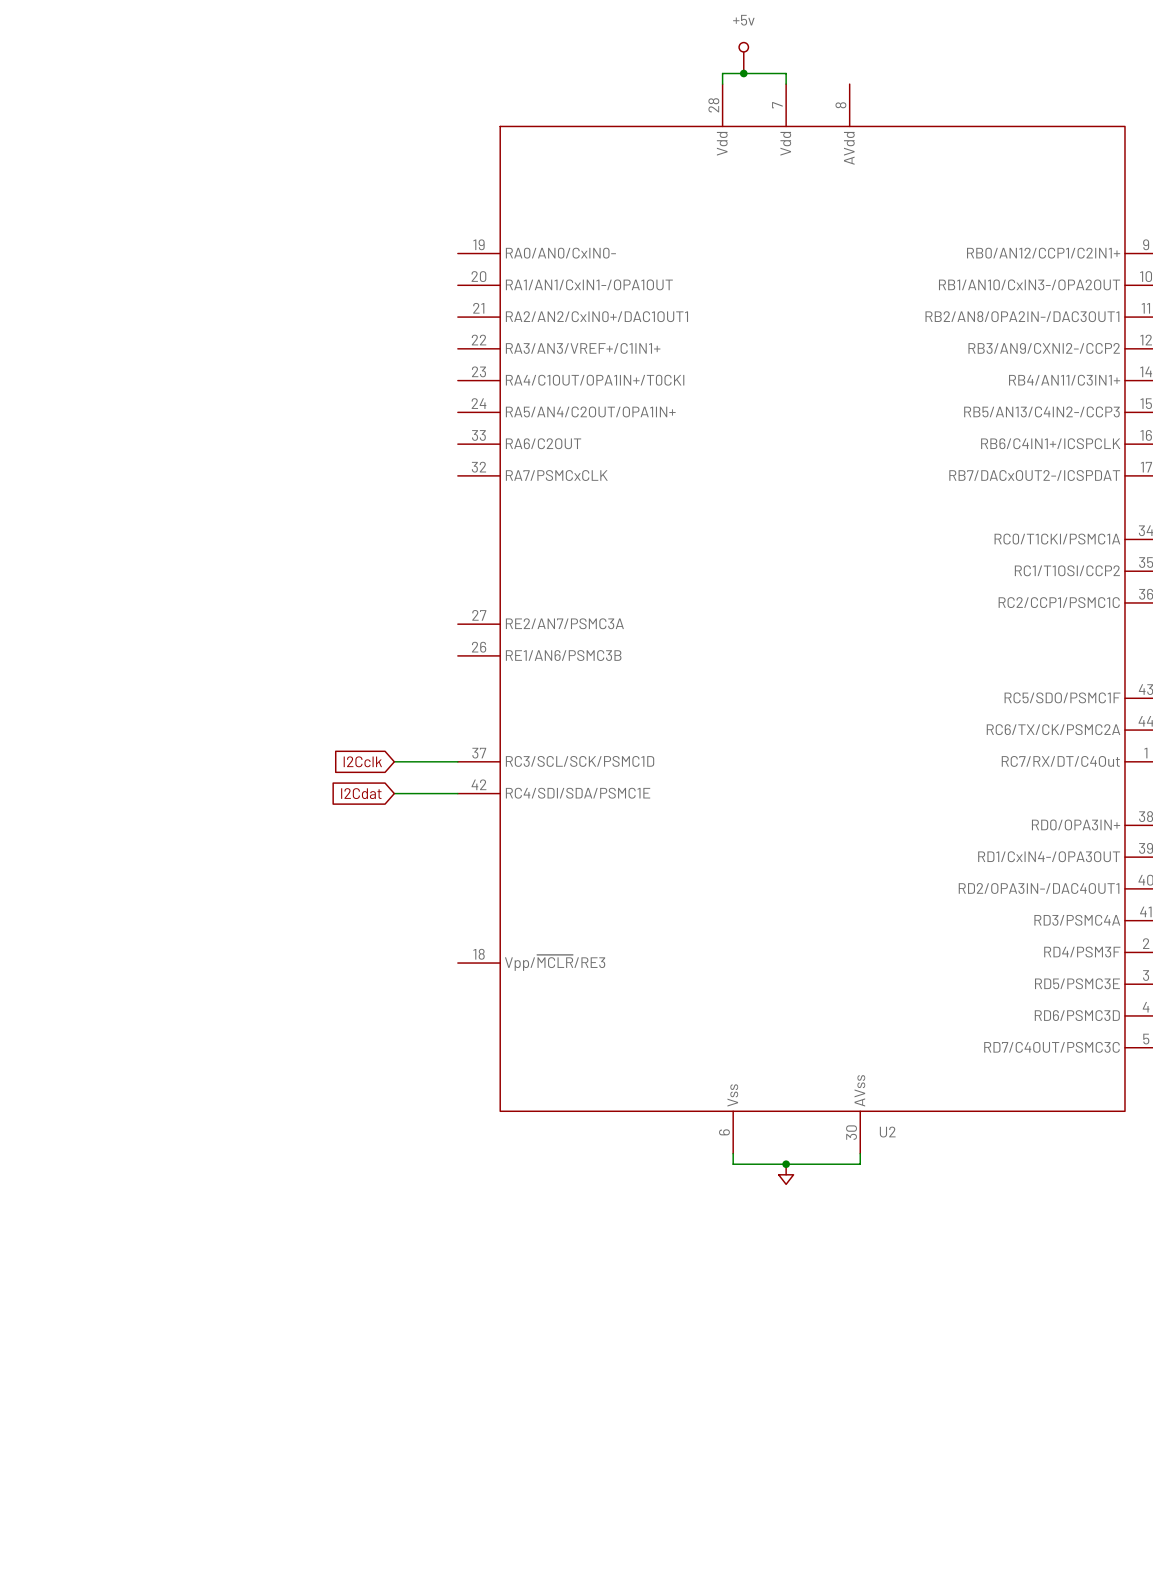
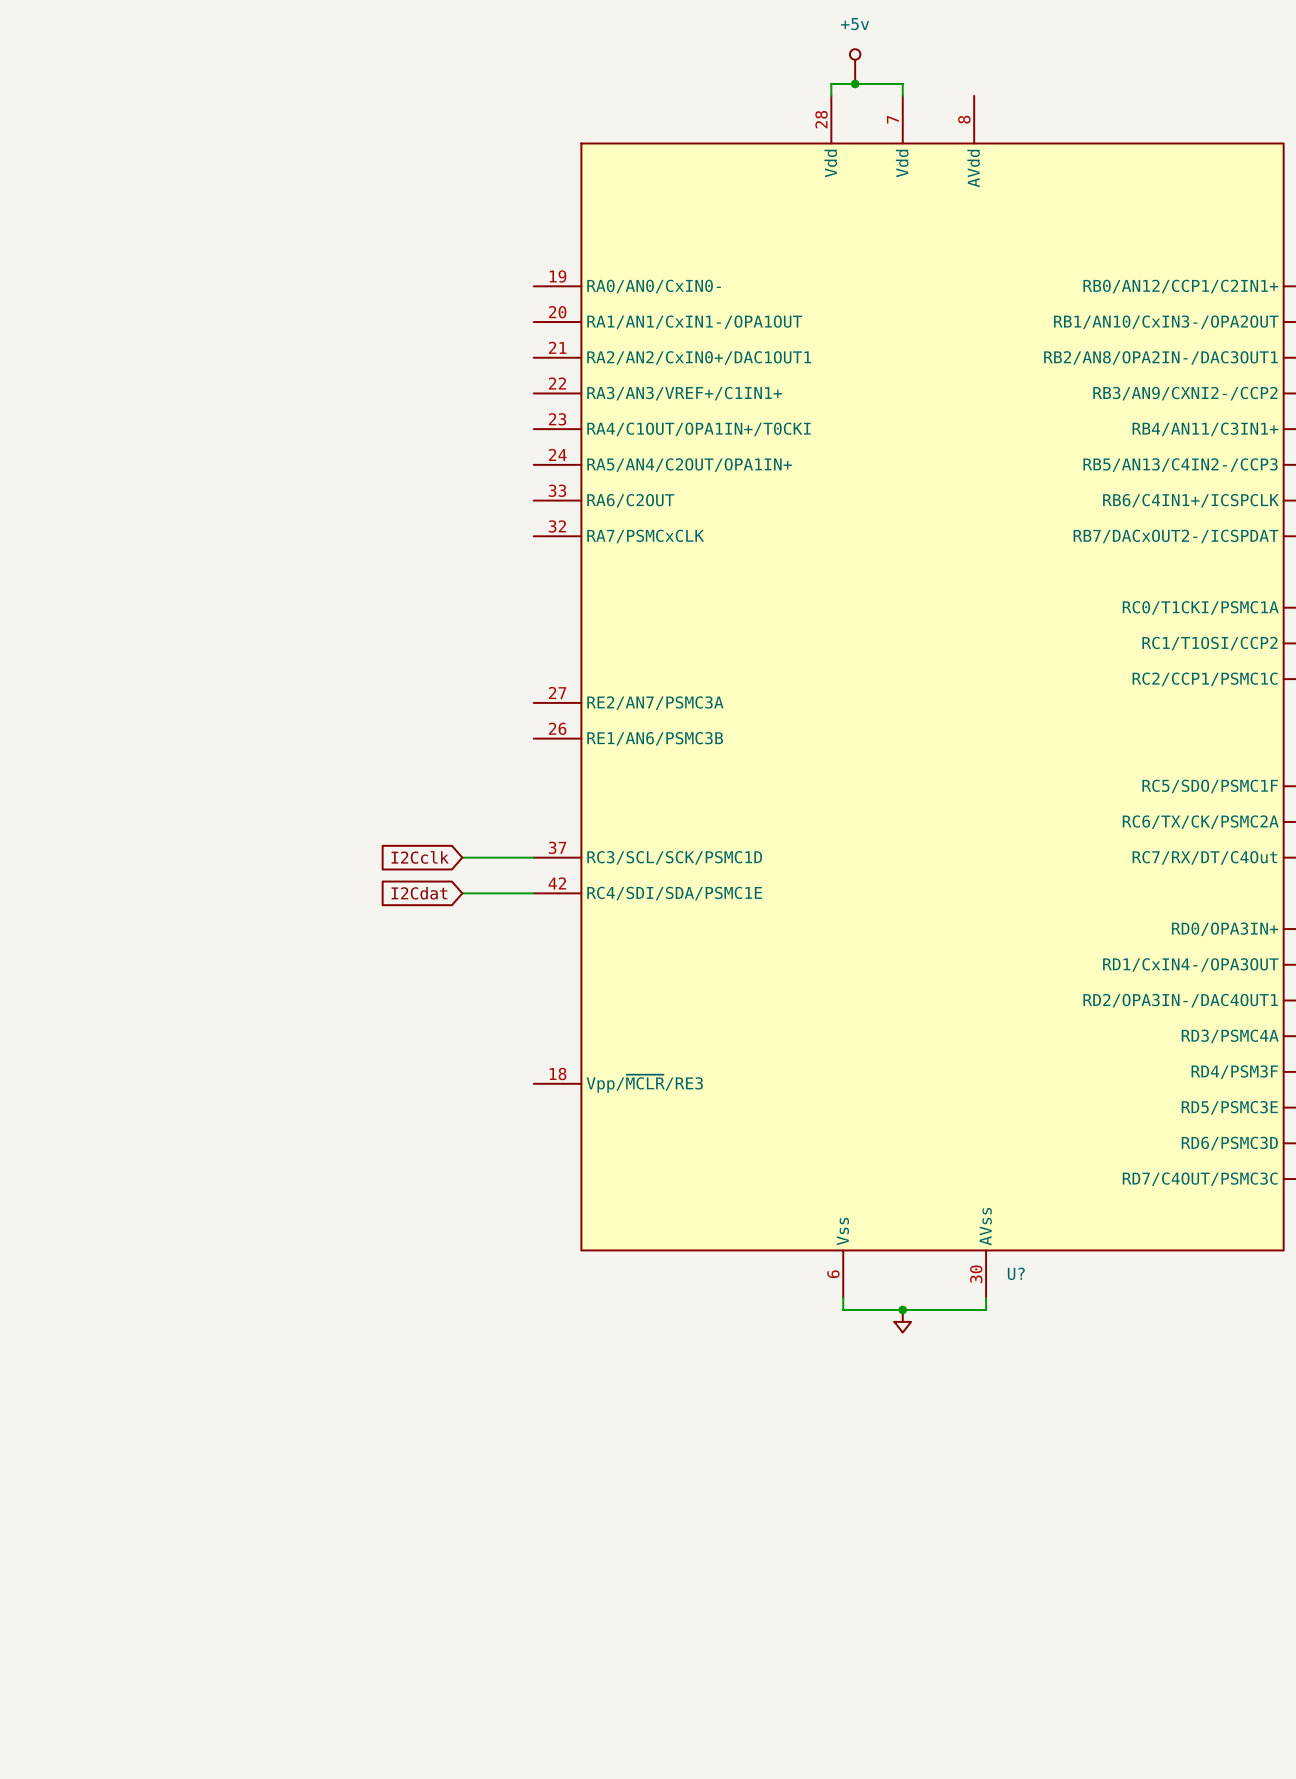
U2 name: U2 (887, 1132) -> U? (1016, 1273)

